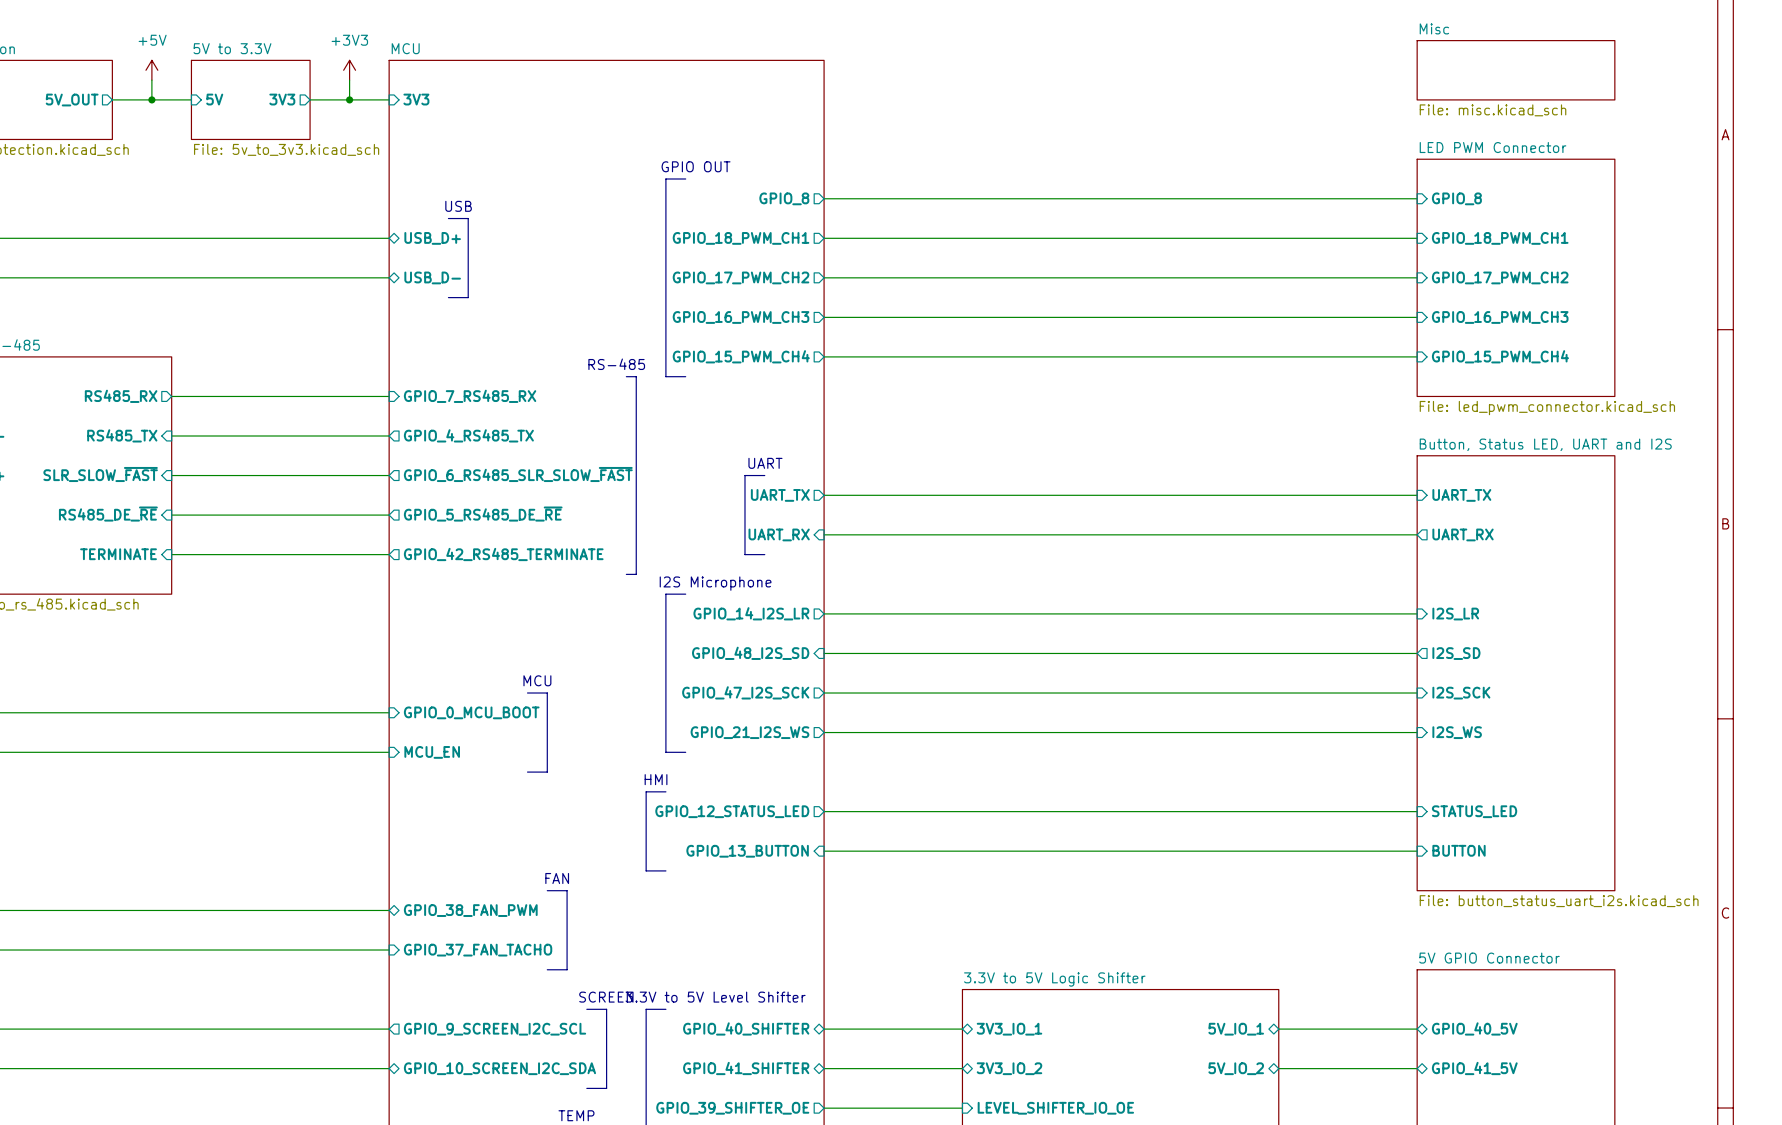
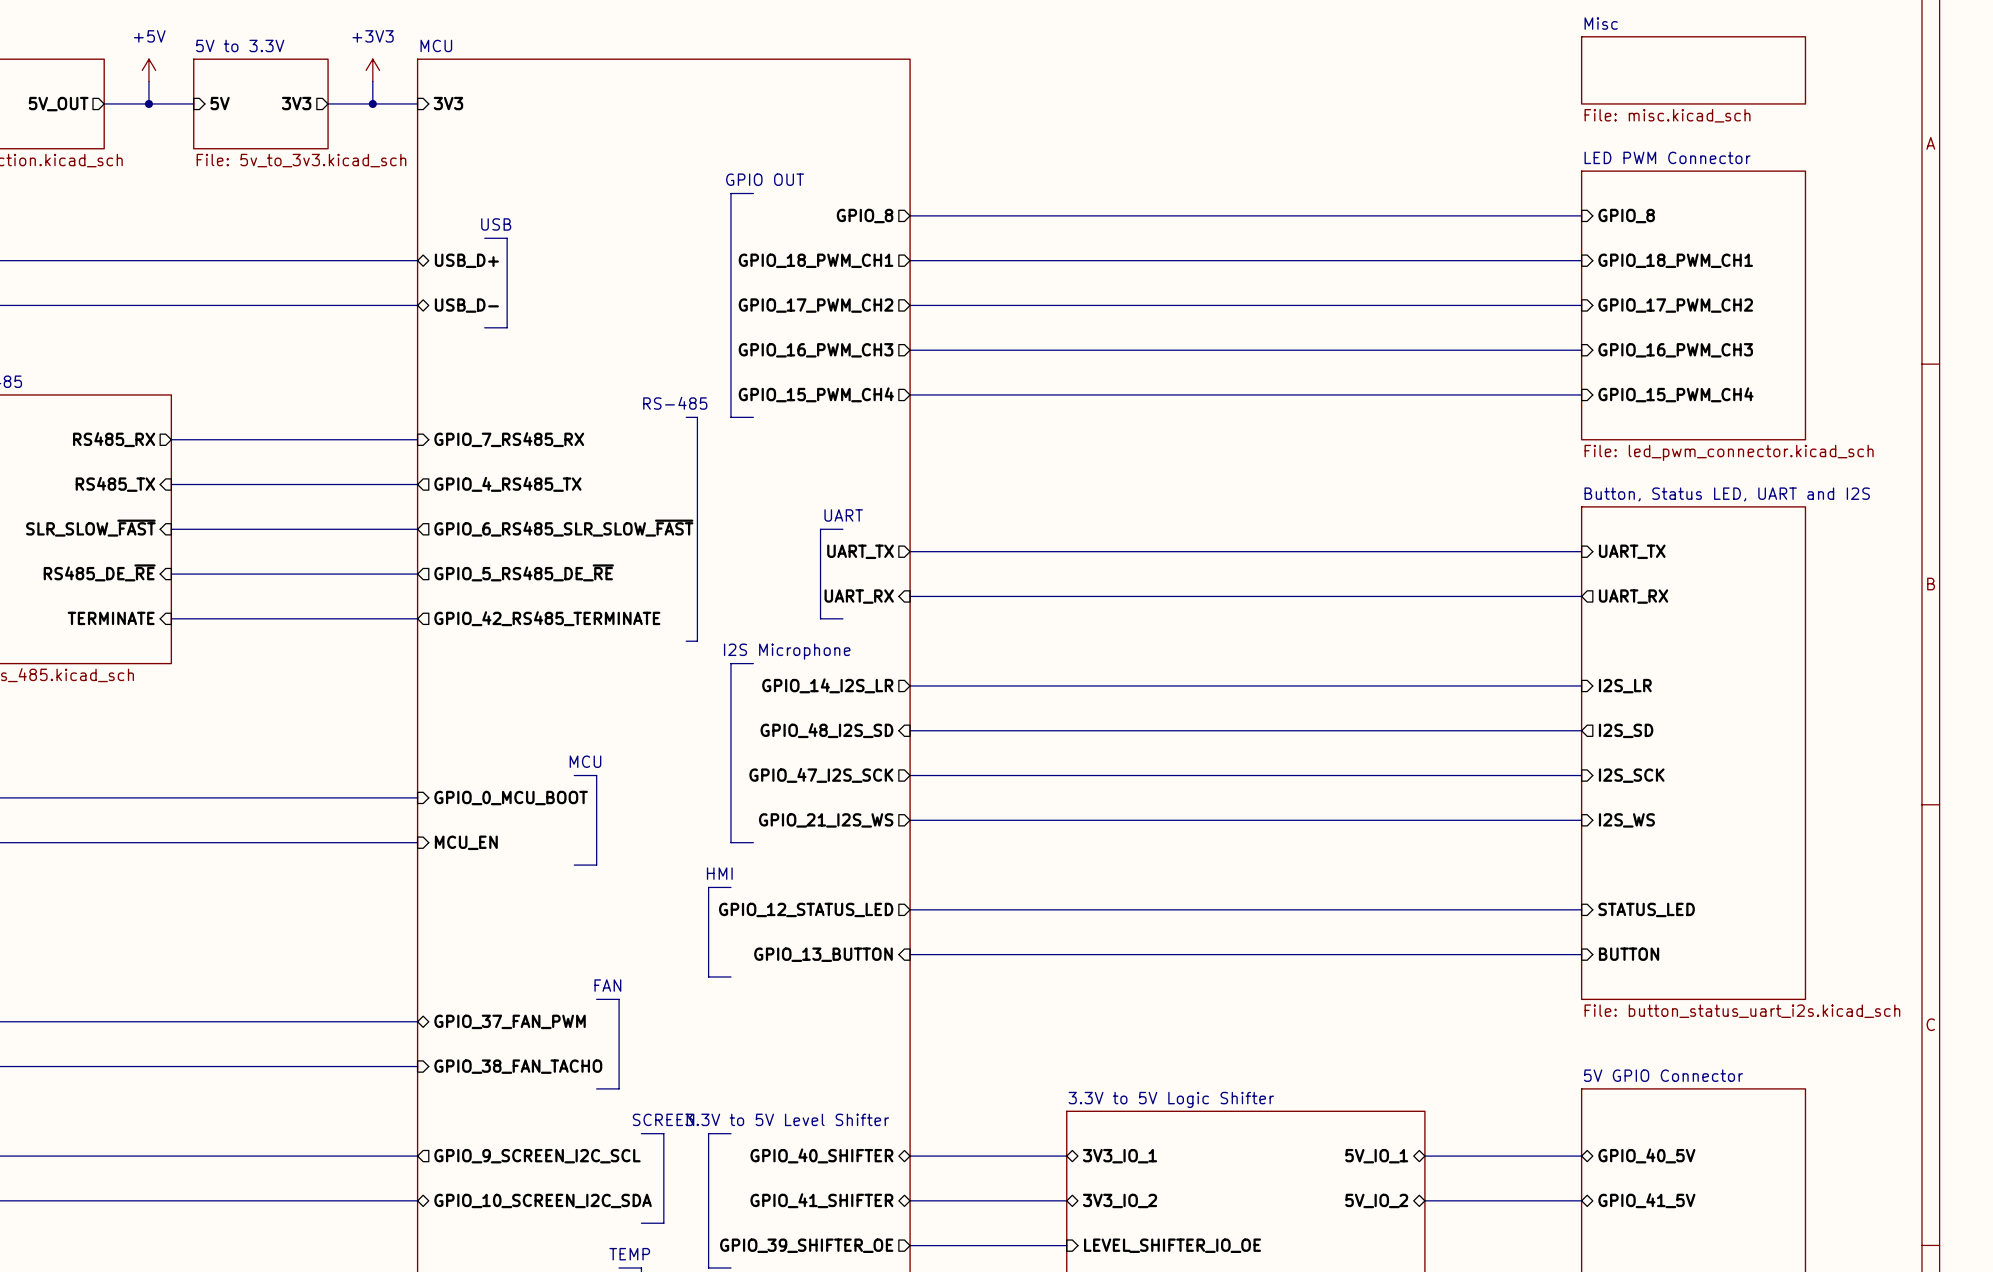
sheet pin: GPIO_38_FAN_PWM (470, 910) -> GPIO_37_FAN_PWM (510, 1021)
sheet pin: GPIO_37_FAN_TACHO (478, 950) -> GPIO_38_FAN_TACHO (518, 1066)

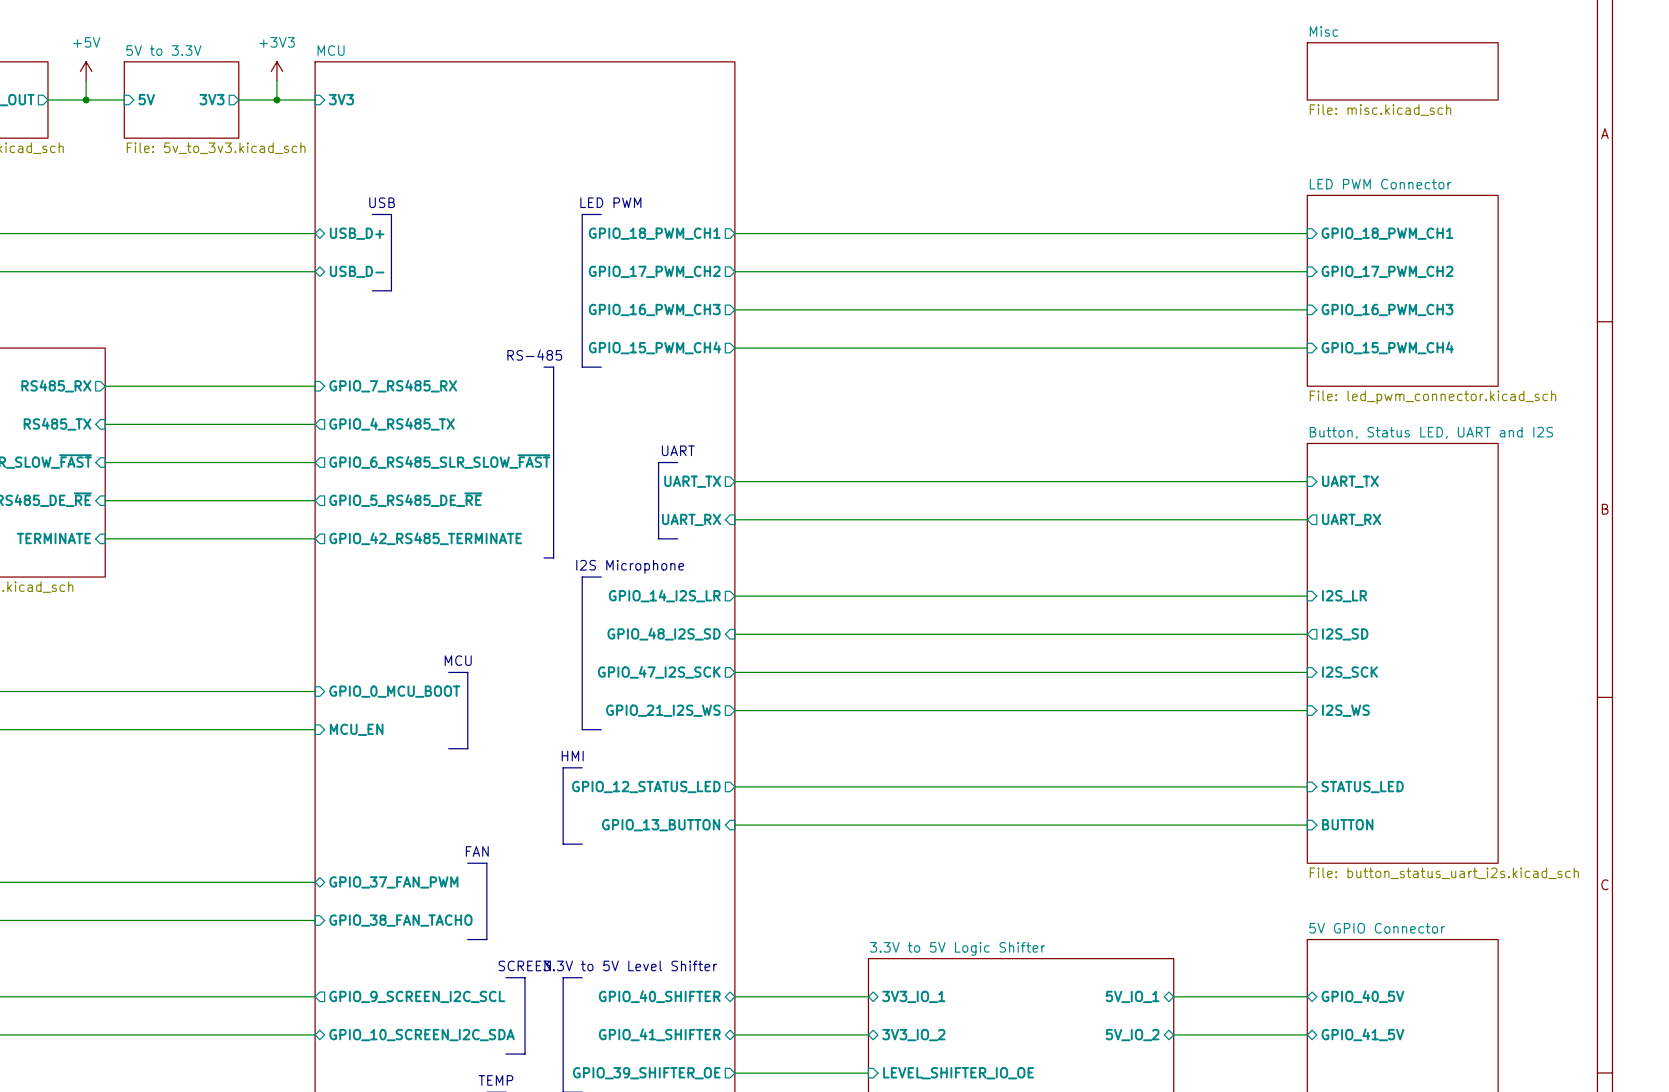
text: GPIO OUT (765, 179) -> none
line: (753, 193) (730, 193) (730, 238) -> (601, 214) (582, 214)
wire: (910, 215) (1581, 215) -> none
sheet pin: GPIO_8 (865, 216) -> none
sheet pin: GPIO_8 (1626, 216) -> none
text: none -> LED PWM (610, 202)
sheet LED PWM Connector: File: led_pwm_connector.kicad_sch (1693, 305) -> none
sheet LED PWM Connector: none -> File: led_pwm_connector.kicad_sch (1402, 290)

